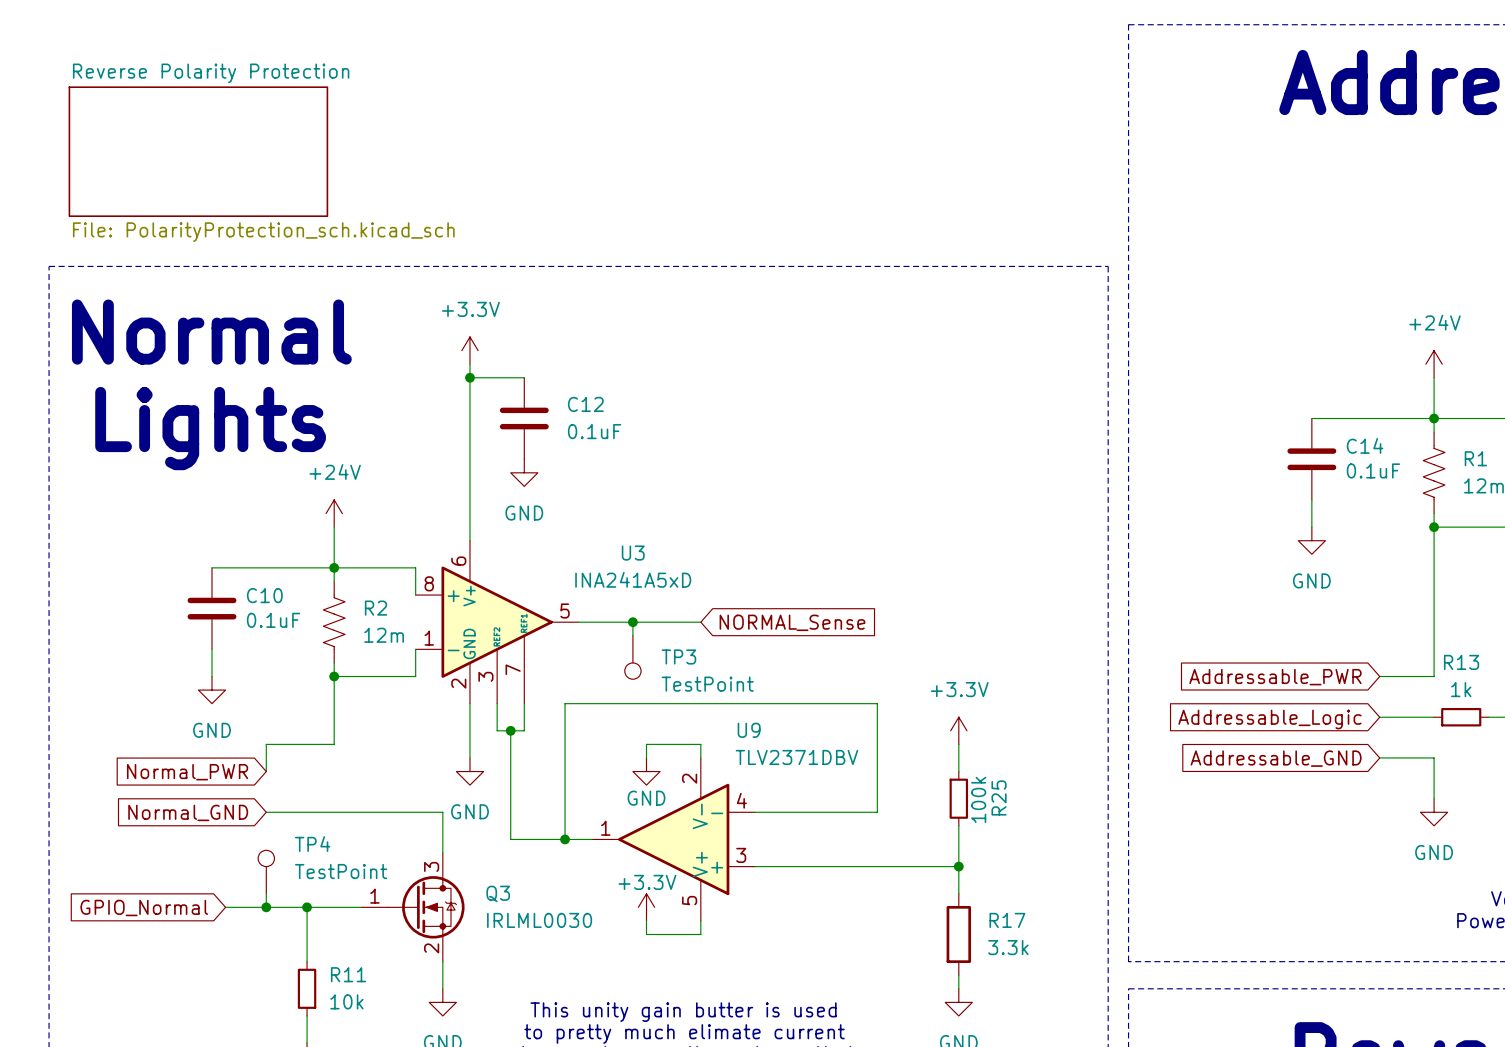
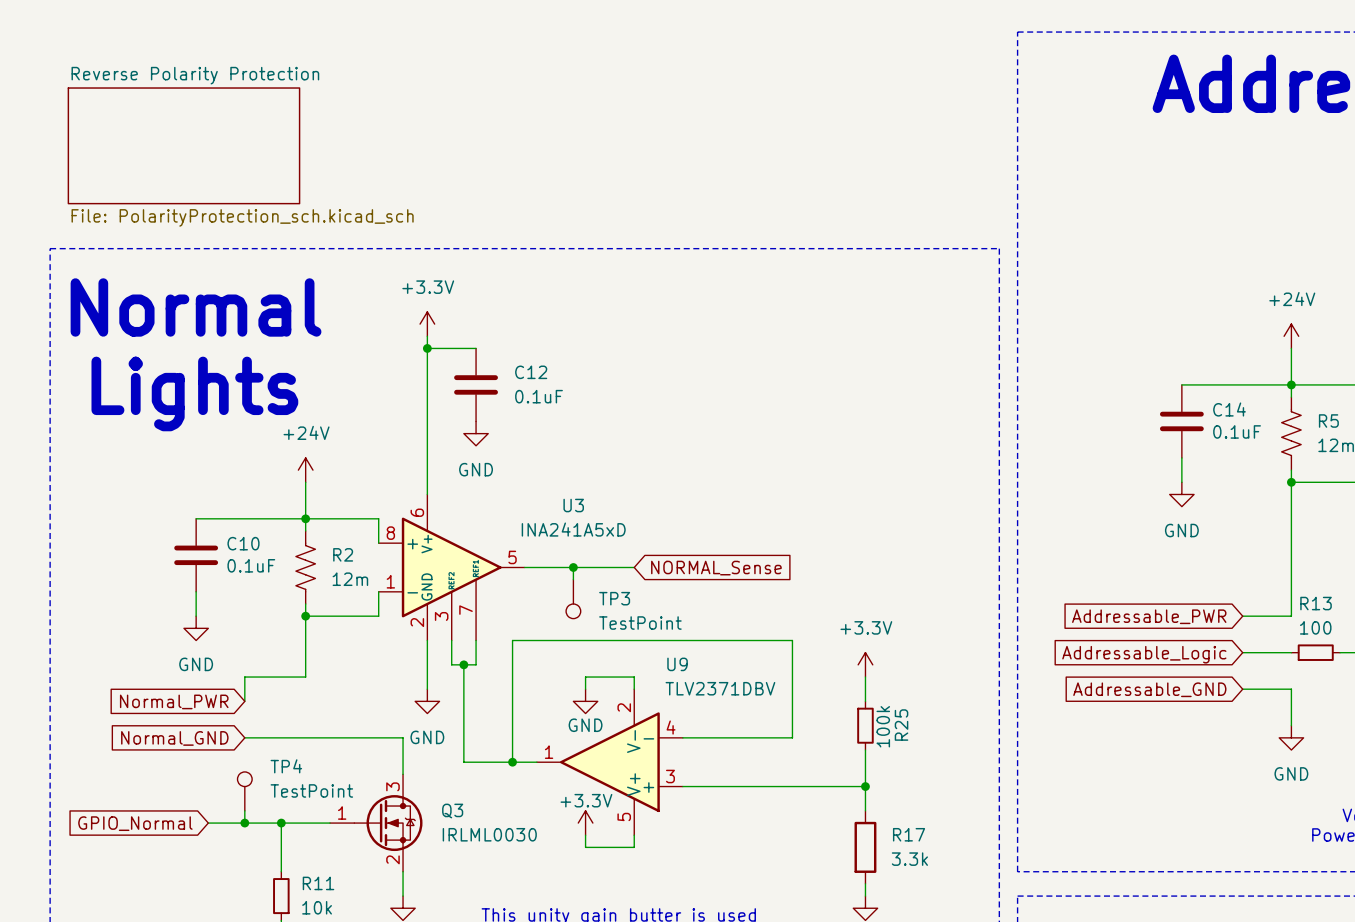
R1 name: R1 (1475, 458) -> R5 (1328, 421)
R13 value: 1k (1461, 689) -> 100 (1315, 627)

